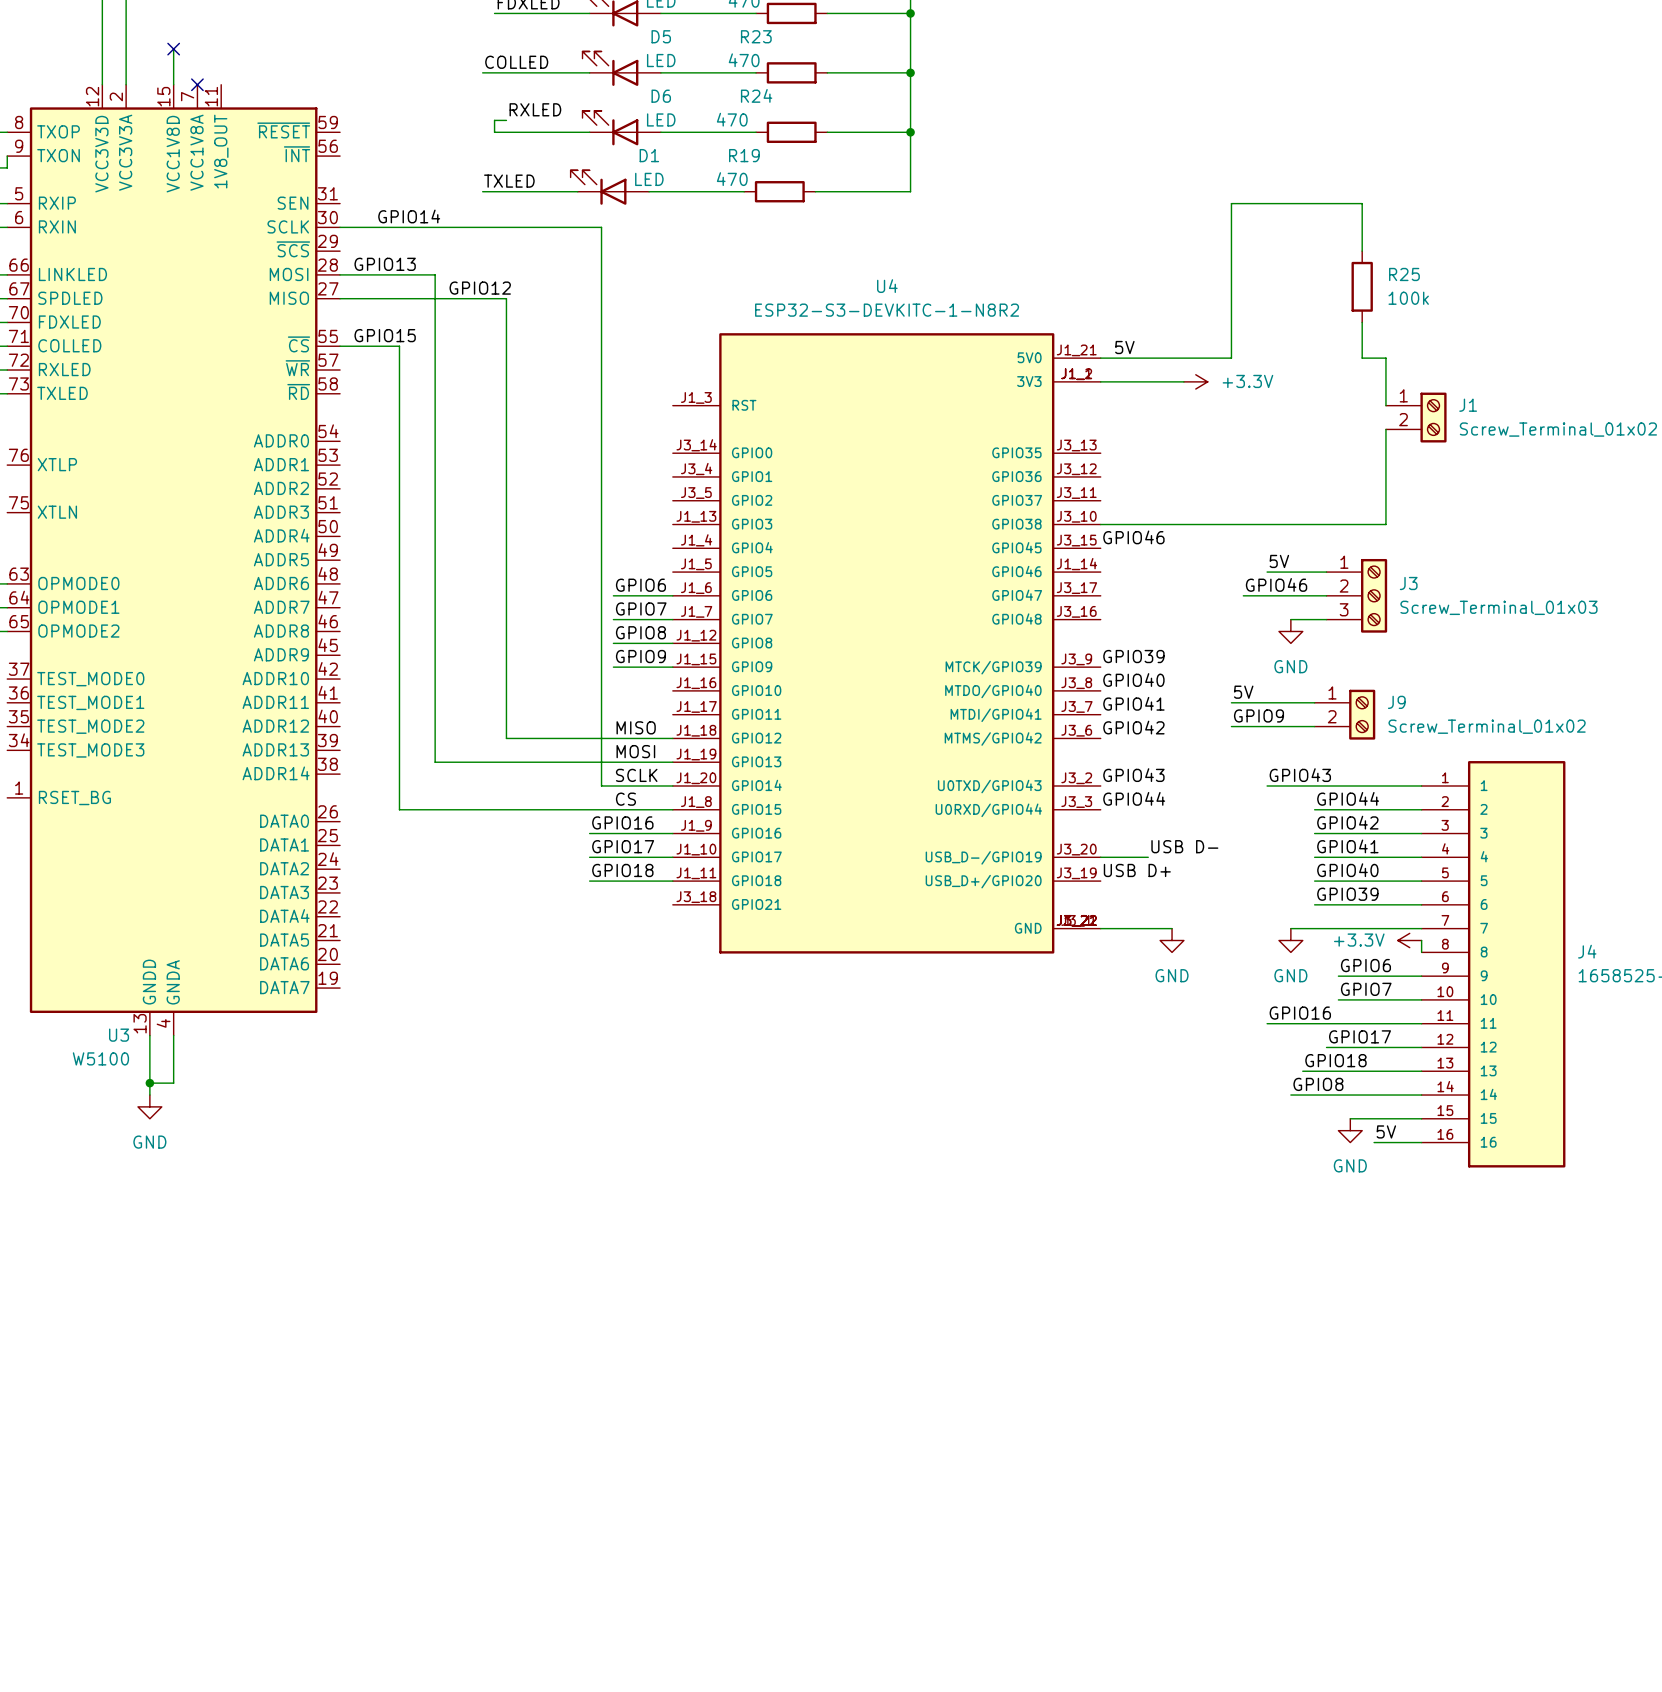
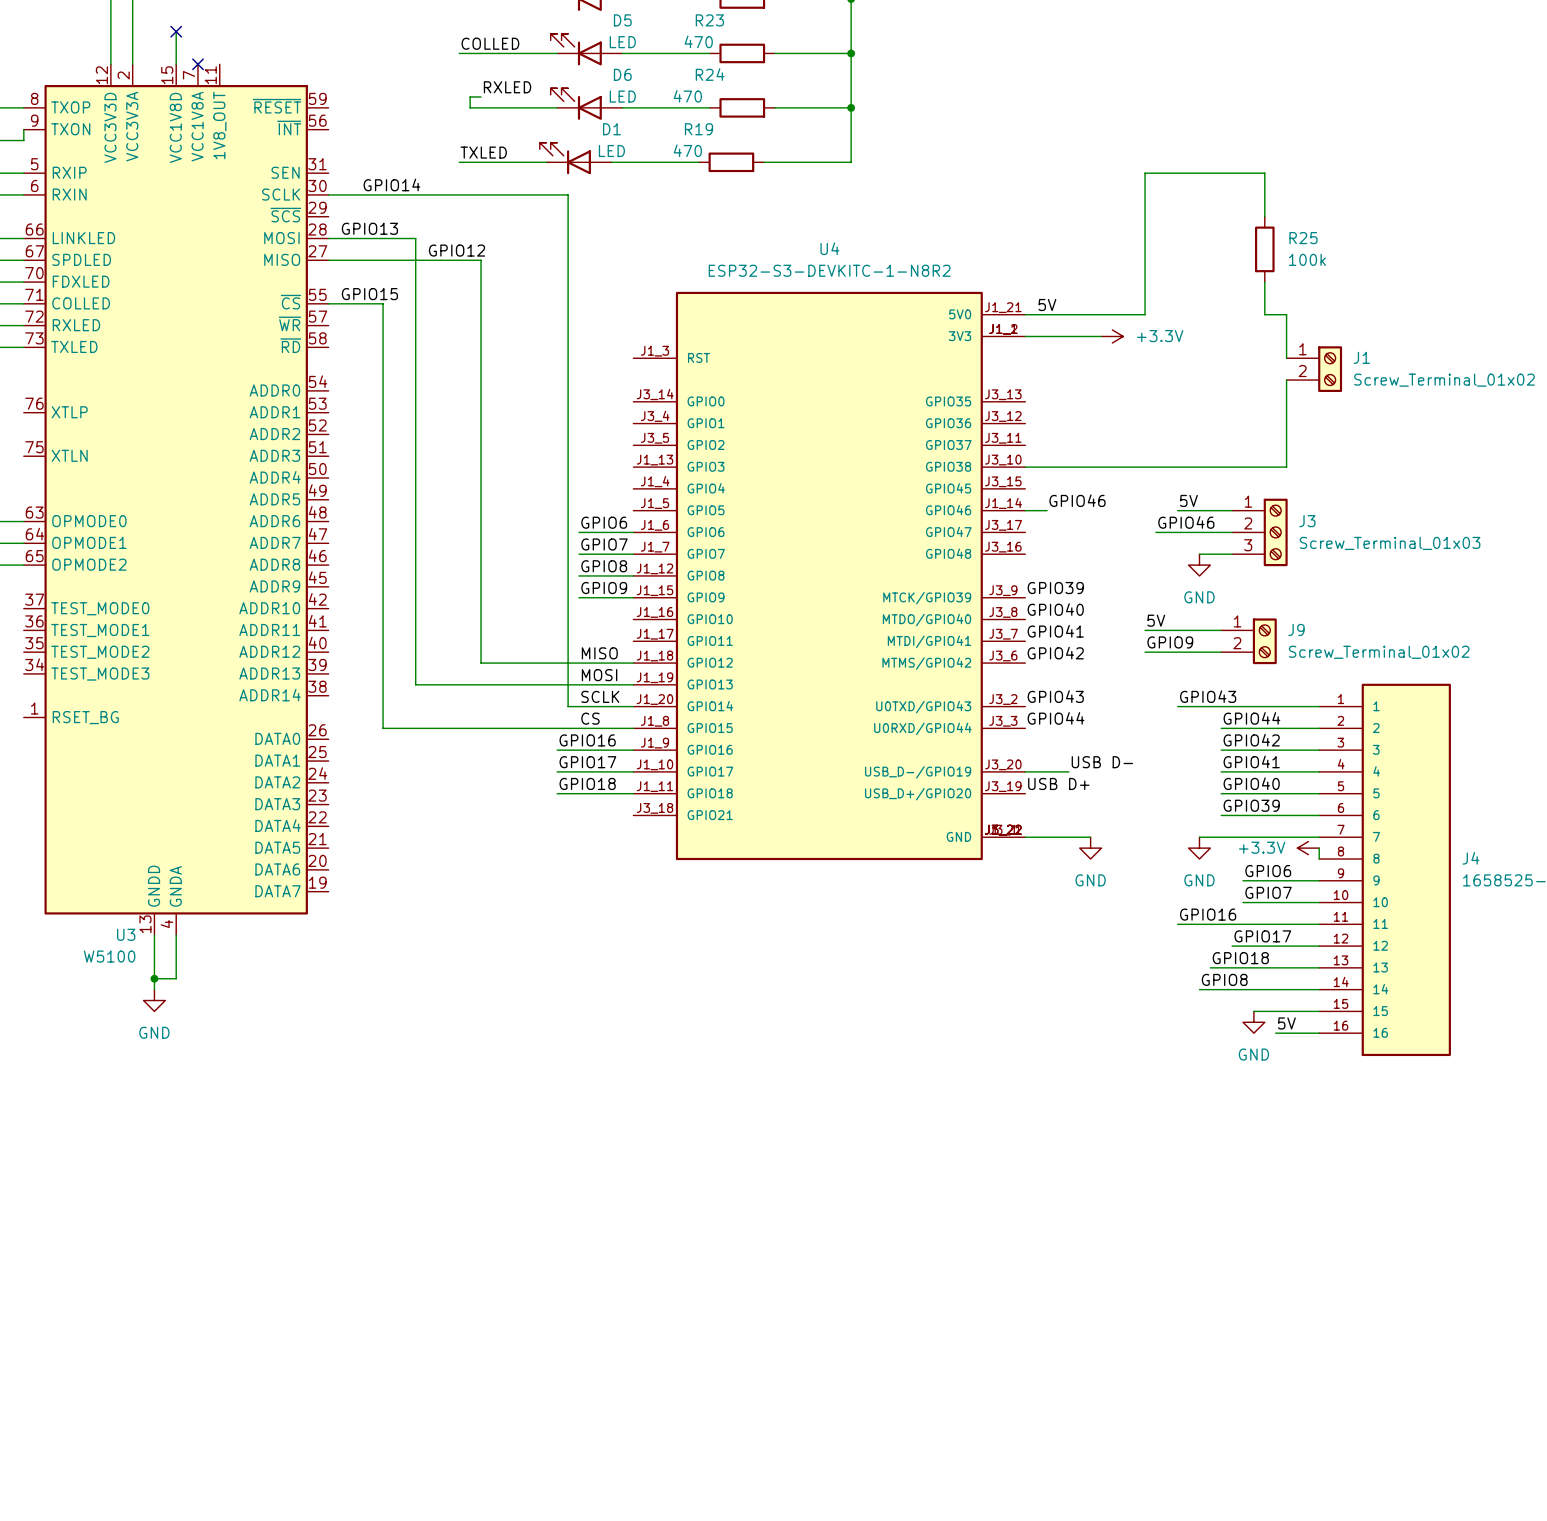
label position: GPIO46 (1133, 537) -> GPIO46 (1077, 500)
wire: none -> (1025, 510) (1047, 510)

